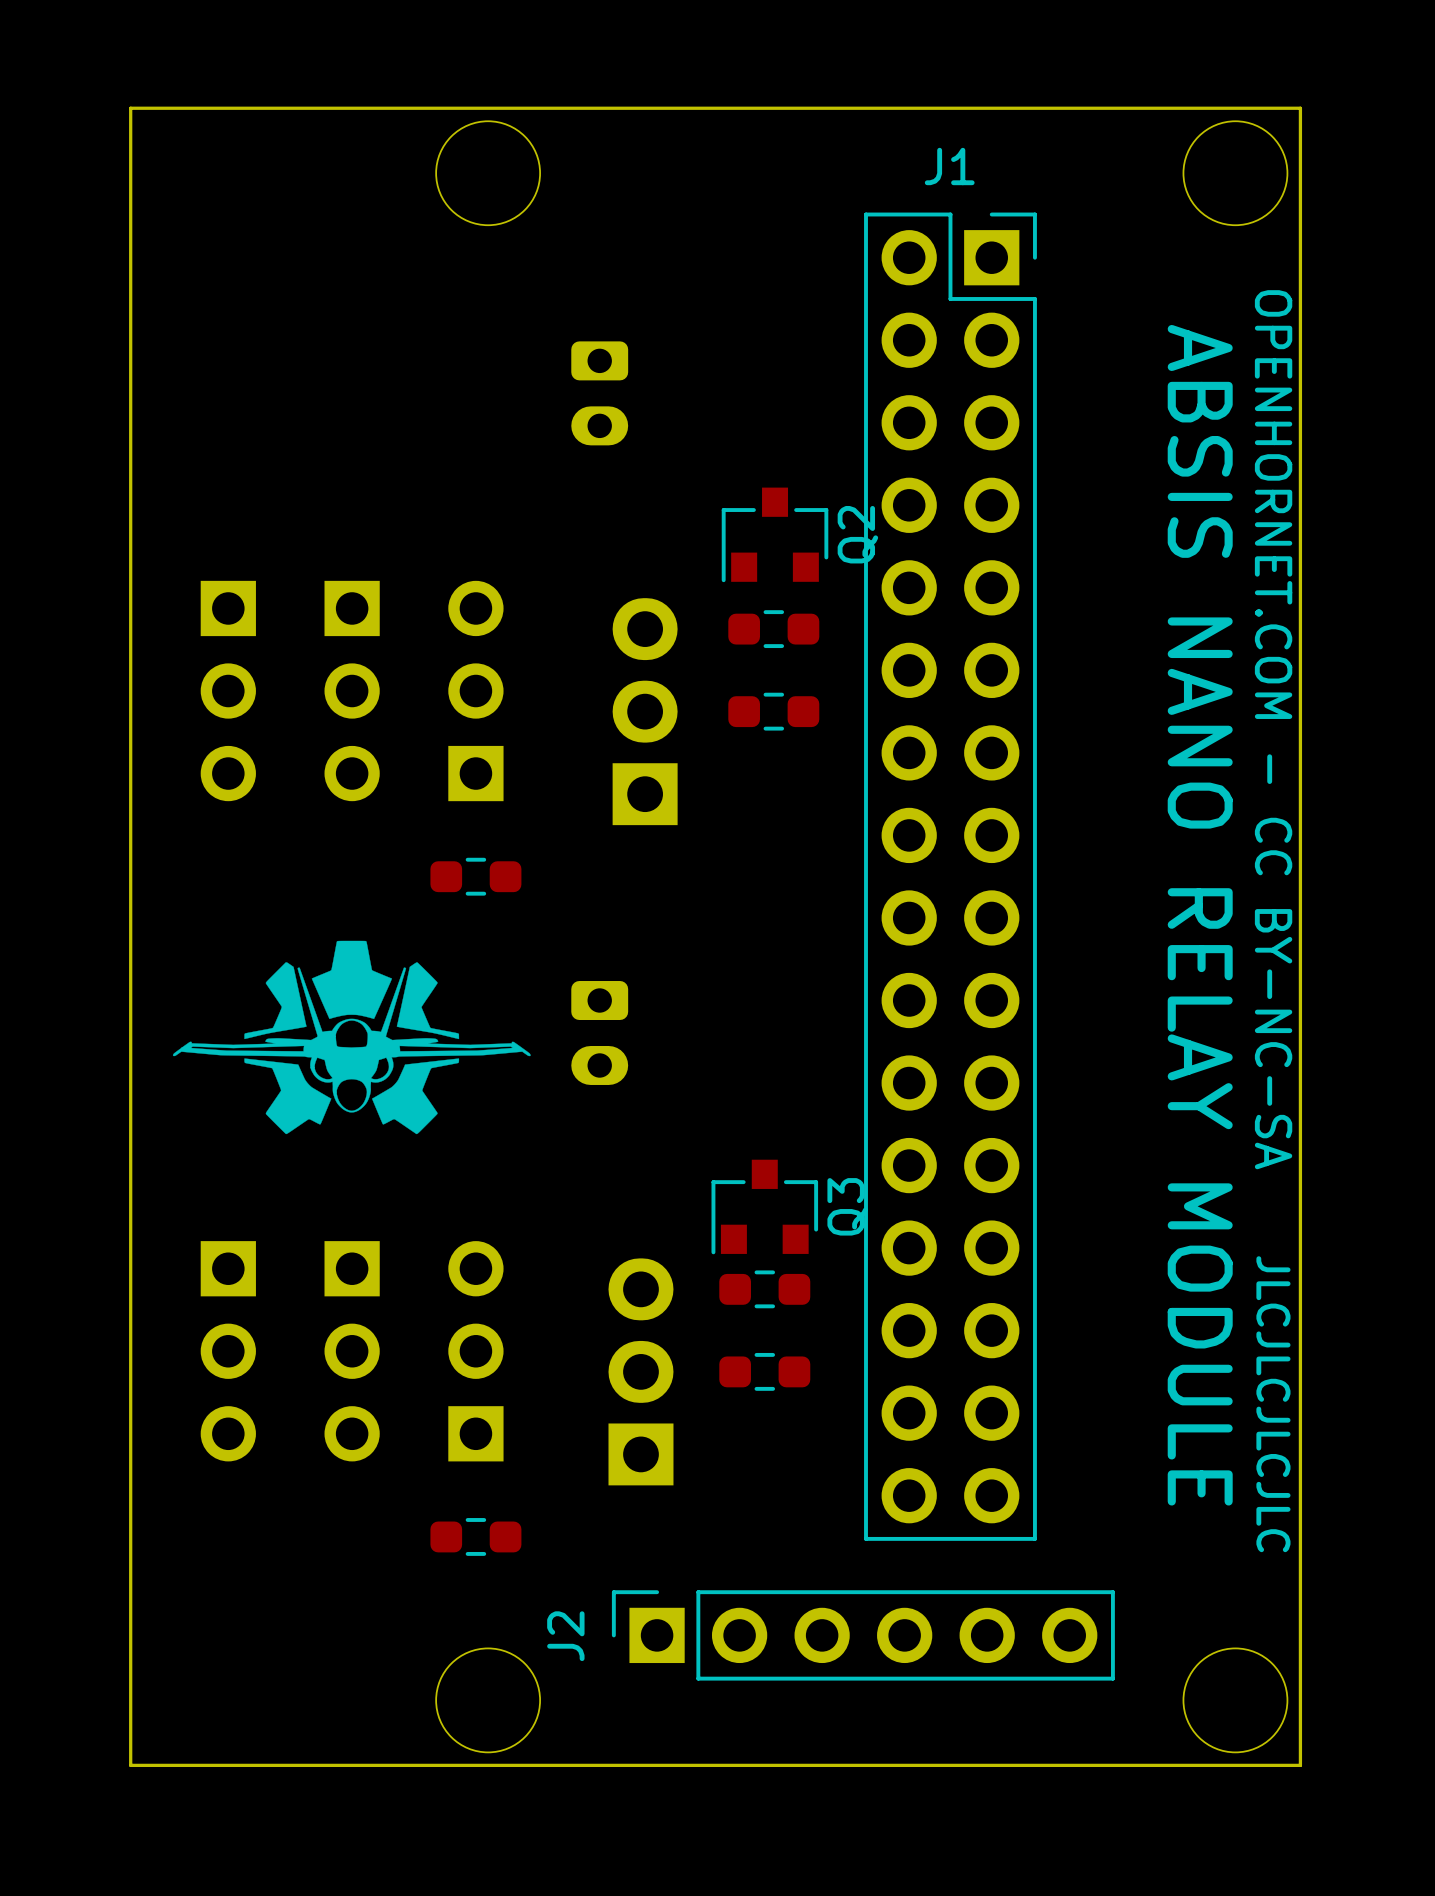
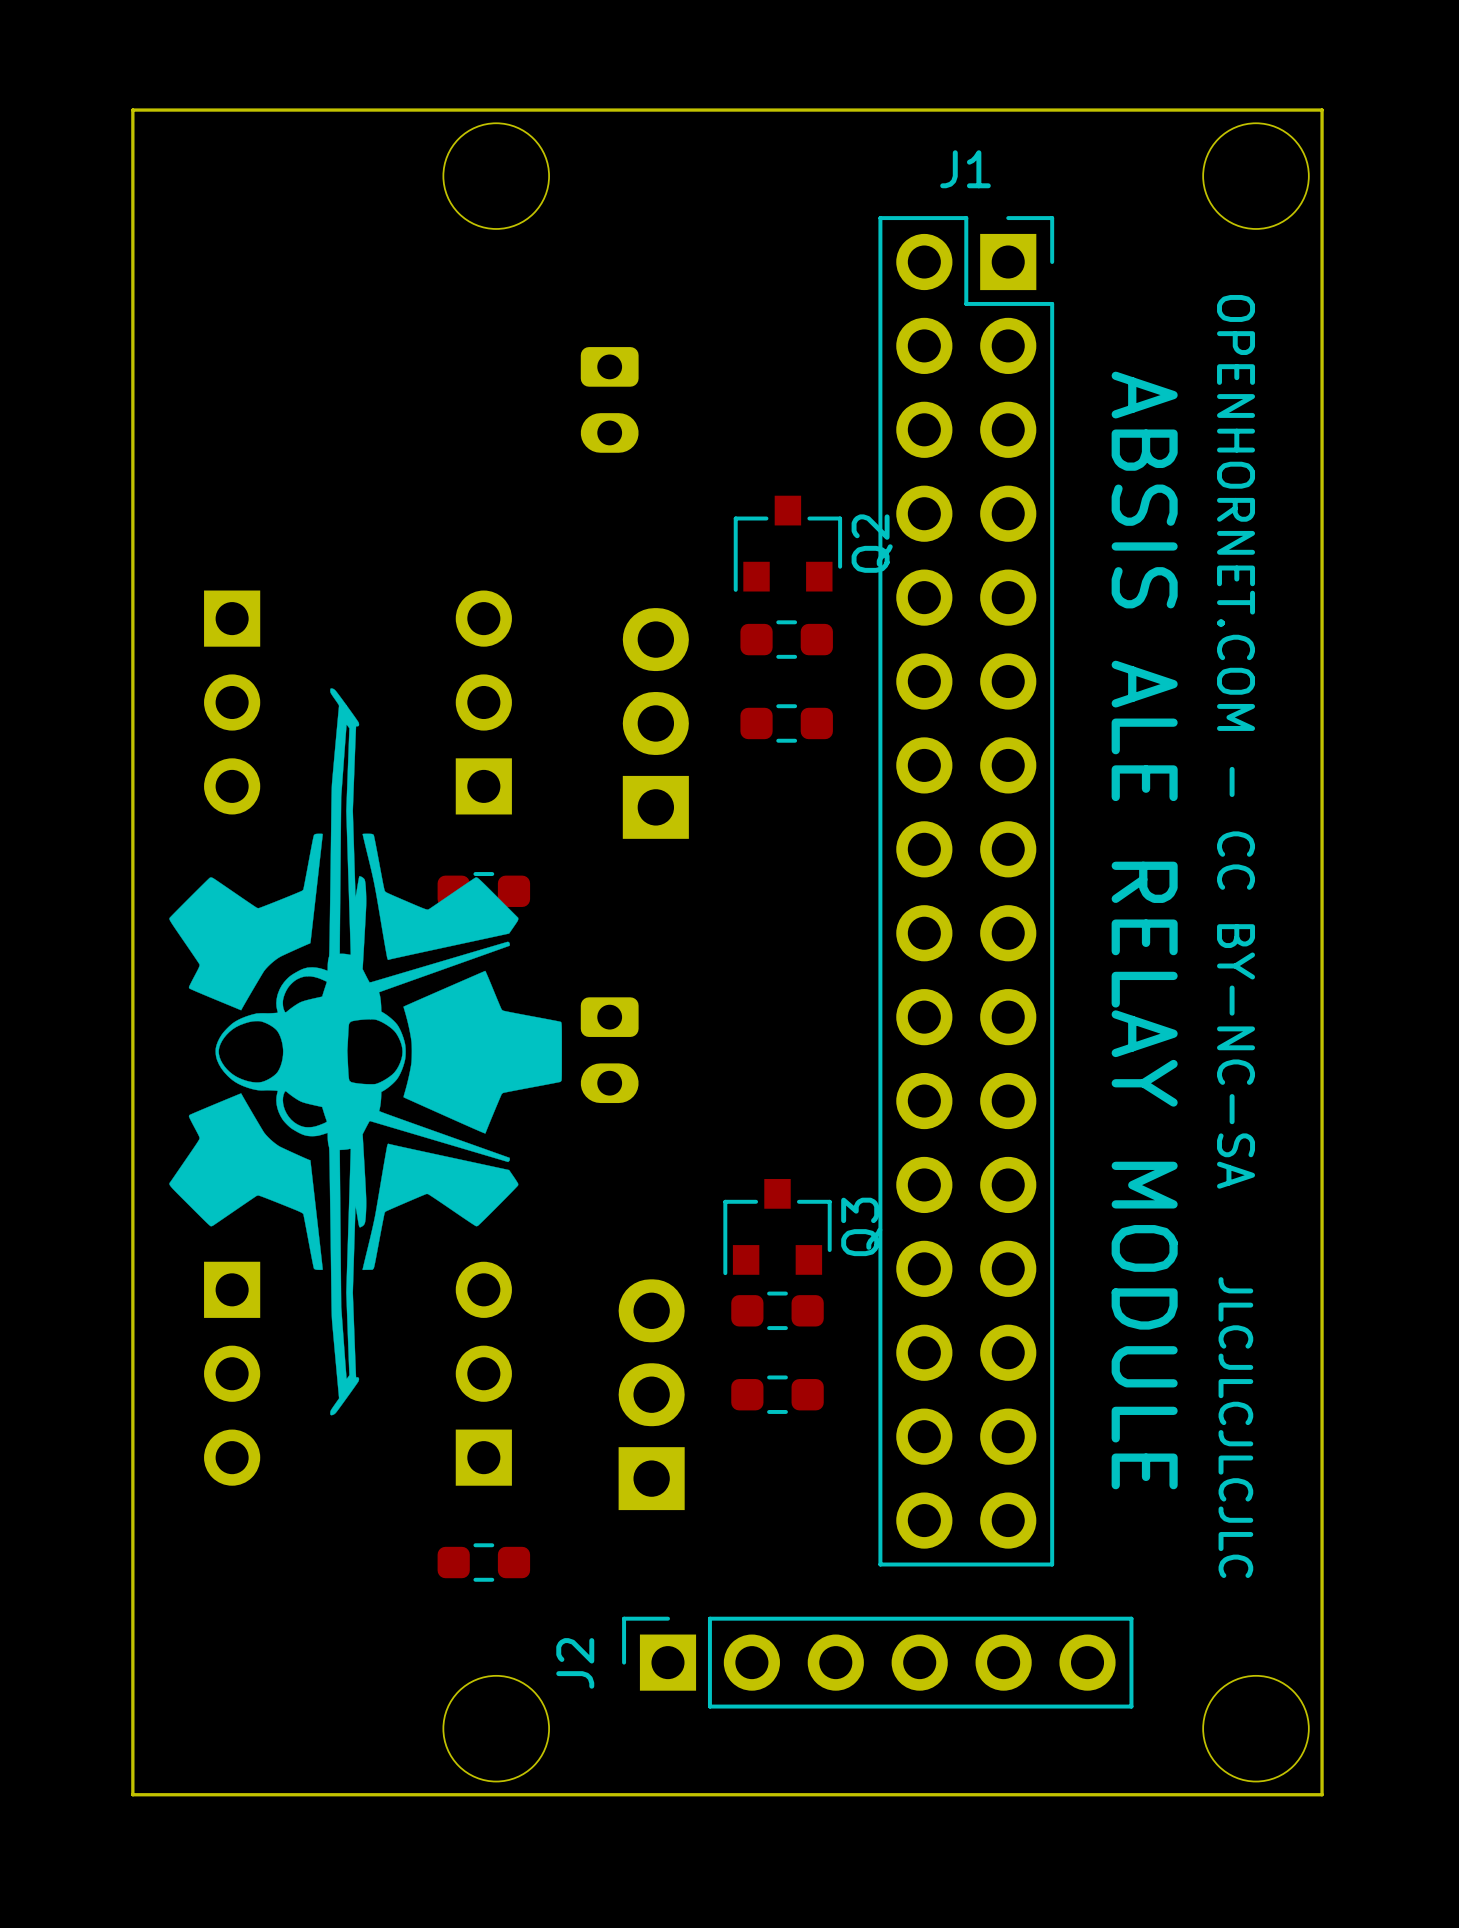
part: (352, 691) -> none
text position: OPENHORNET.COM - CC BY-NC-SA (1273, 729) -> OPENHORNET.COM - CC BY-NC-SA (1236, 741)
text: ABSIS NANO RELAY MODULE (1200, 915) -> ABSIS ALE RELAY MODULE (1144, 930)
drawing shape: [172, 940, 531, 1135] -> [169, 688, 562, 1416]
part: (352, 1351) -> none
text position: JLCJLCJLCJLC (1273, 1404) -> JLCJLCJLCJLC (1235, 1427)

